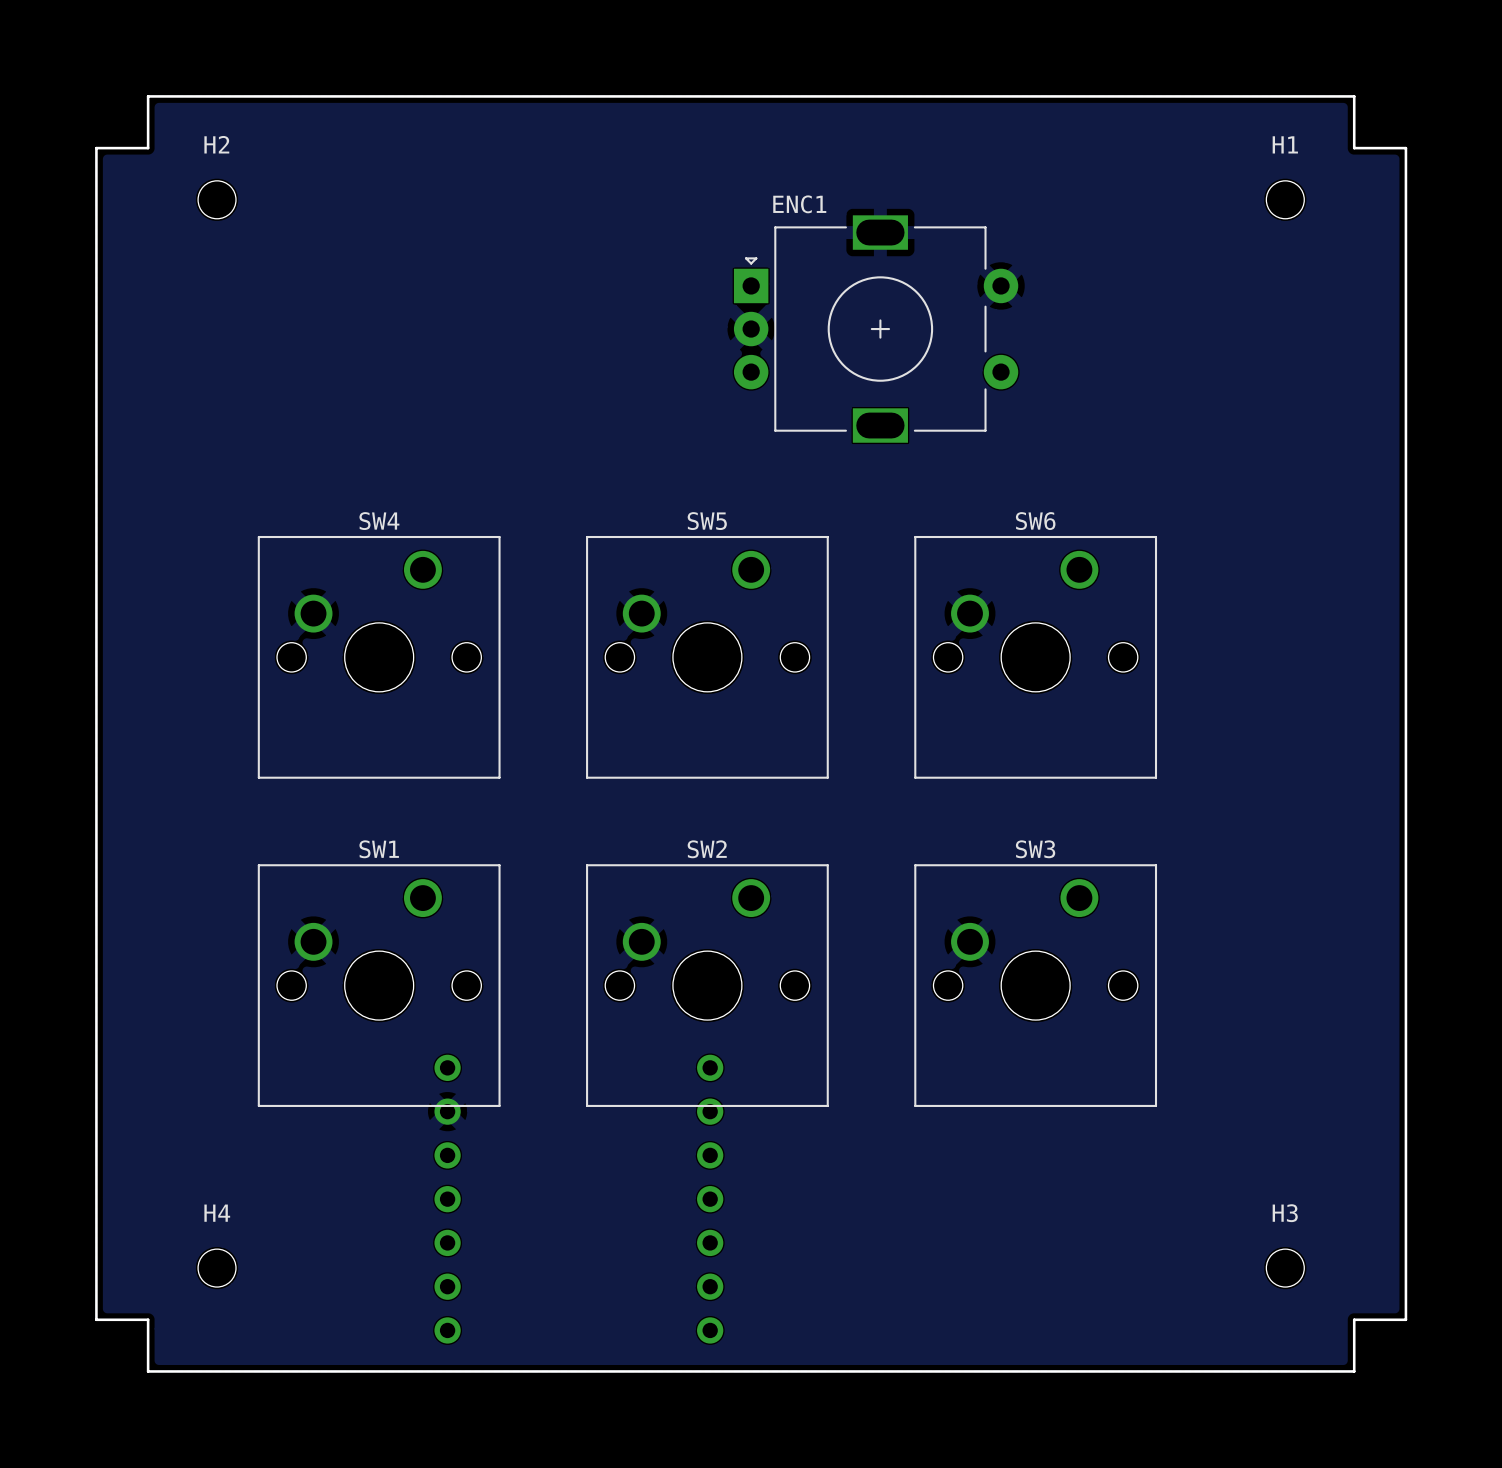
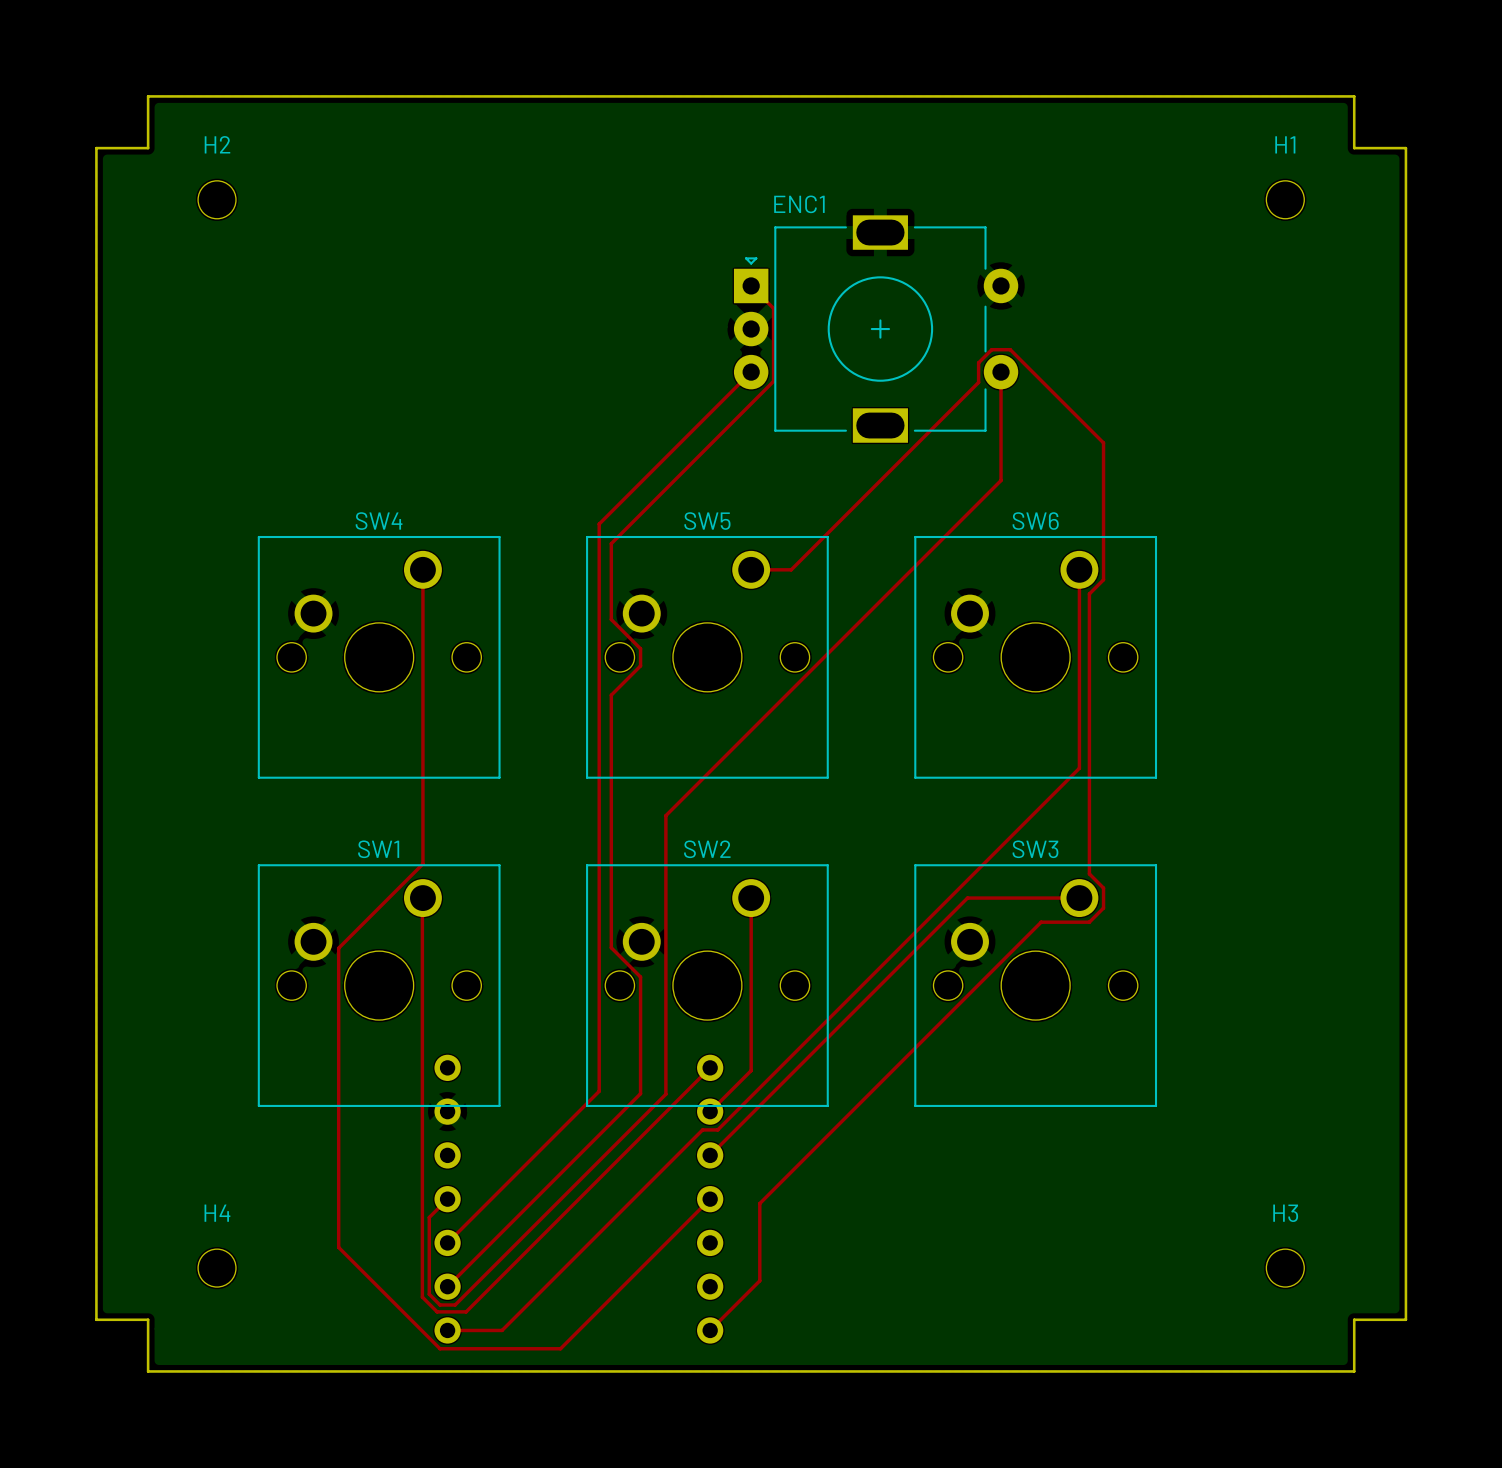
top track: none -> (751, 285) (773, 308) (773, 381) (611, 543) (611, 619) (640, 648) (640, 665) (611, 695) (611, 947) (640, 977) (640, 1093) (447, 1286)
top track: none -> (751, 372) (599, 524) (599, 1091) (447, 1242)
top track: none -> (1001, 372) (1001, 480) (665, 815) (665, 1094) (455, 1304) (440, 1304) (429, 1294) (429, 1217) (447, 1199)
top track: none -> (422, 569) (422, 863) (338, 948) (338, 1247) (440, 1348) (560, 1348) (710, 1199)
top track: none -> (751, 569) (791, 569) (978, 382) (978, 362) (991, 349) (1010, 349) (1103, 442) (1103, 579) (1089, 593) (1089, 873) (1103, 888) (1103, 908) (1089, 922) (1041, 922) (759, 1203) (759, 1280) (710, 1330)
top track: none -> (1079, 569) (1079, 768) (717, 1129) (702, 1129) (502, 1330) (447, 1330)
top track: none -> (422, 898) (422, 1297) (437, 1311) (466, 1311) (710, 1067)
top track: none -> (751, 898) (751, 1070) (710, 1111)
top track: none -> (1079, 898) (967, 898) (710, 1155)

